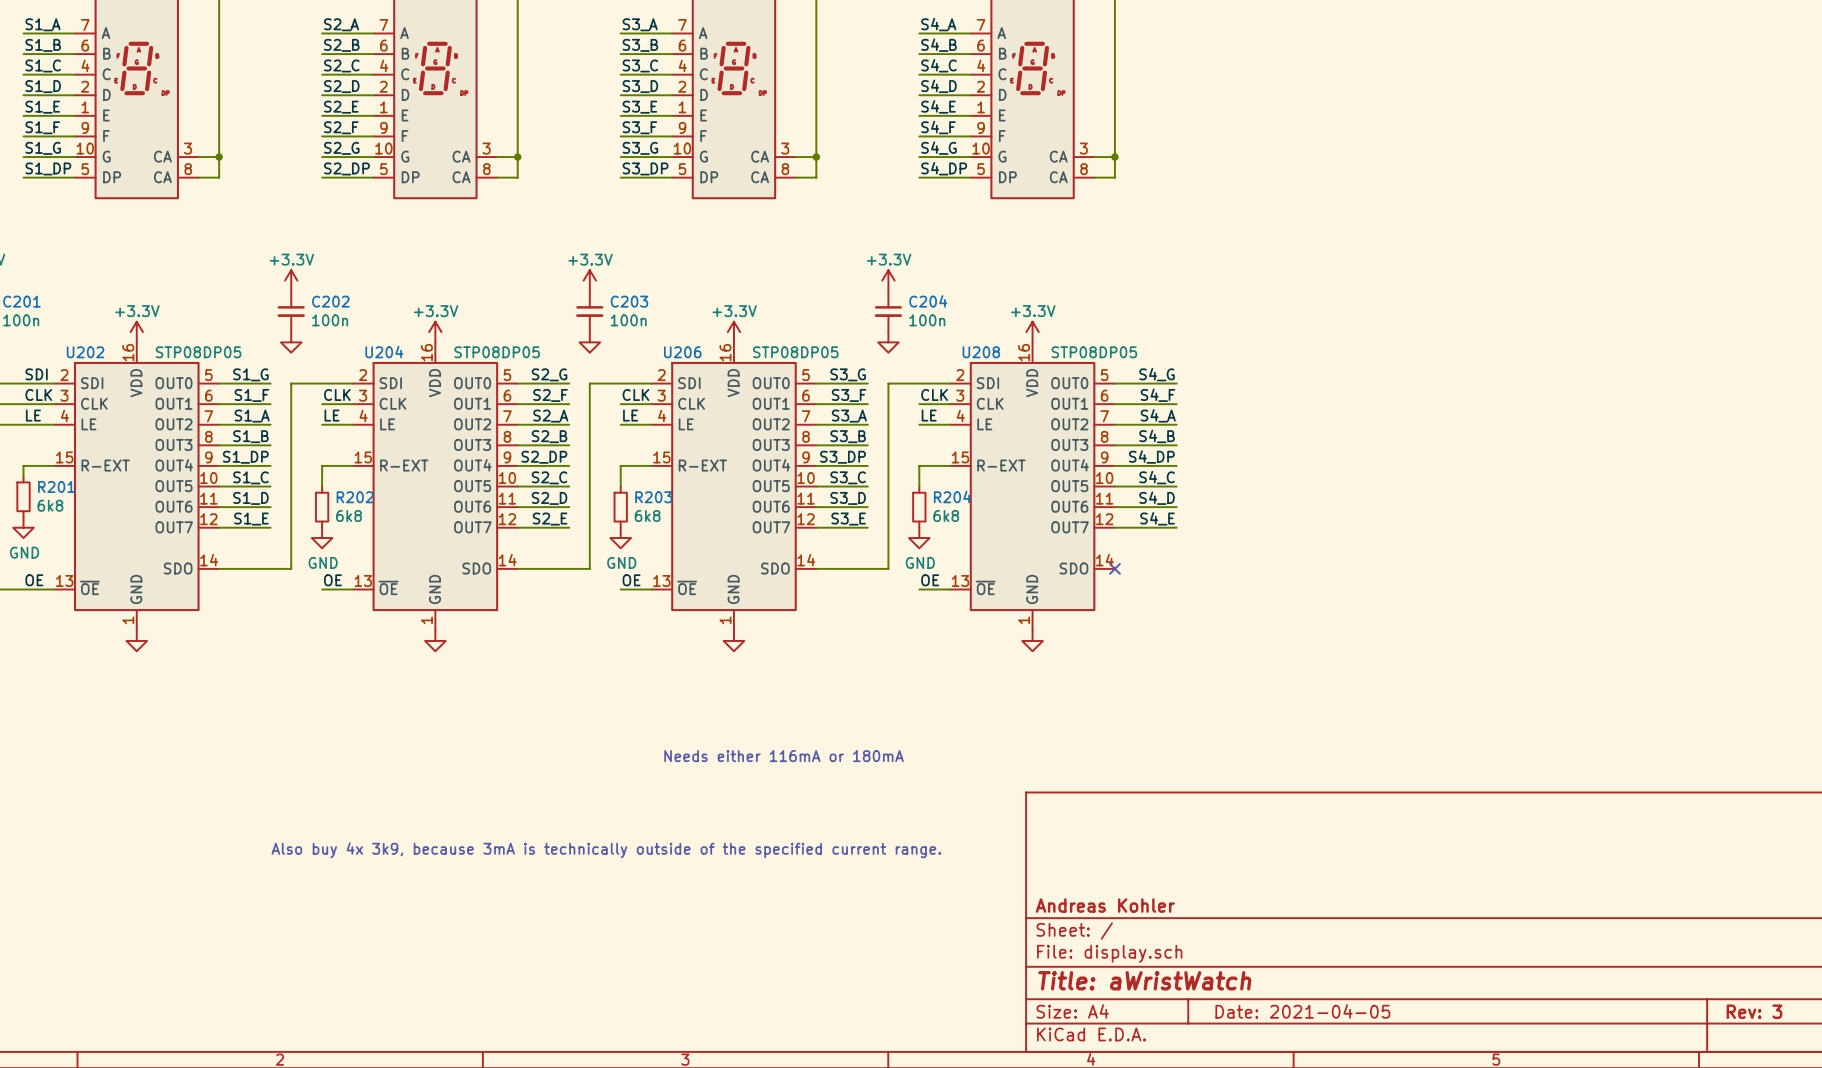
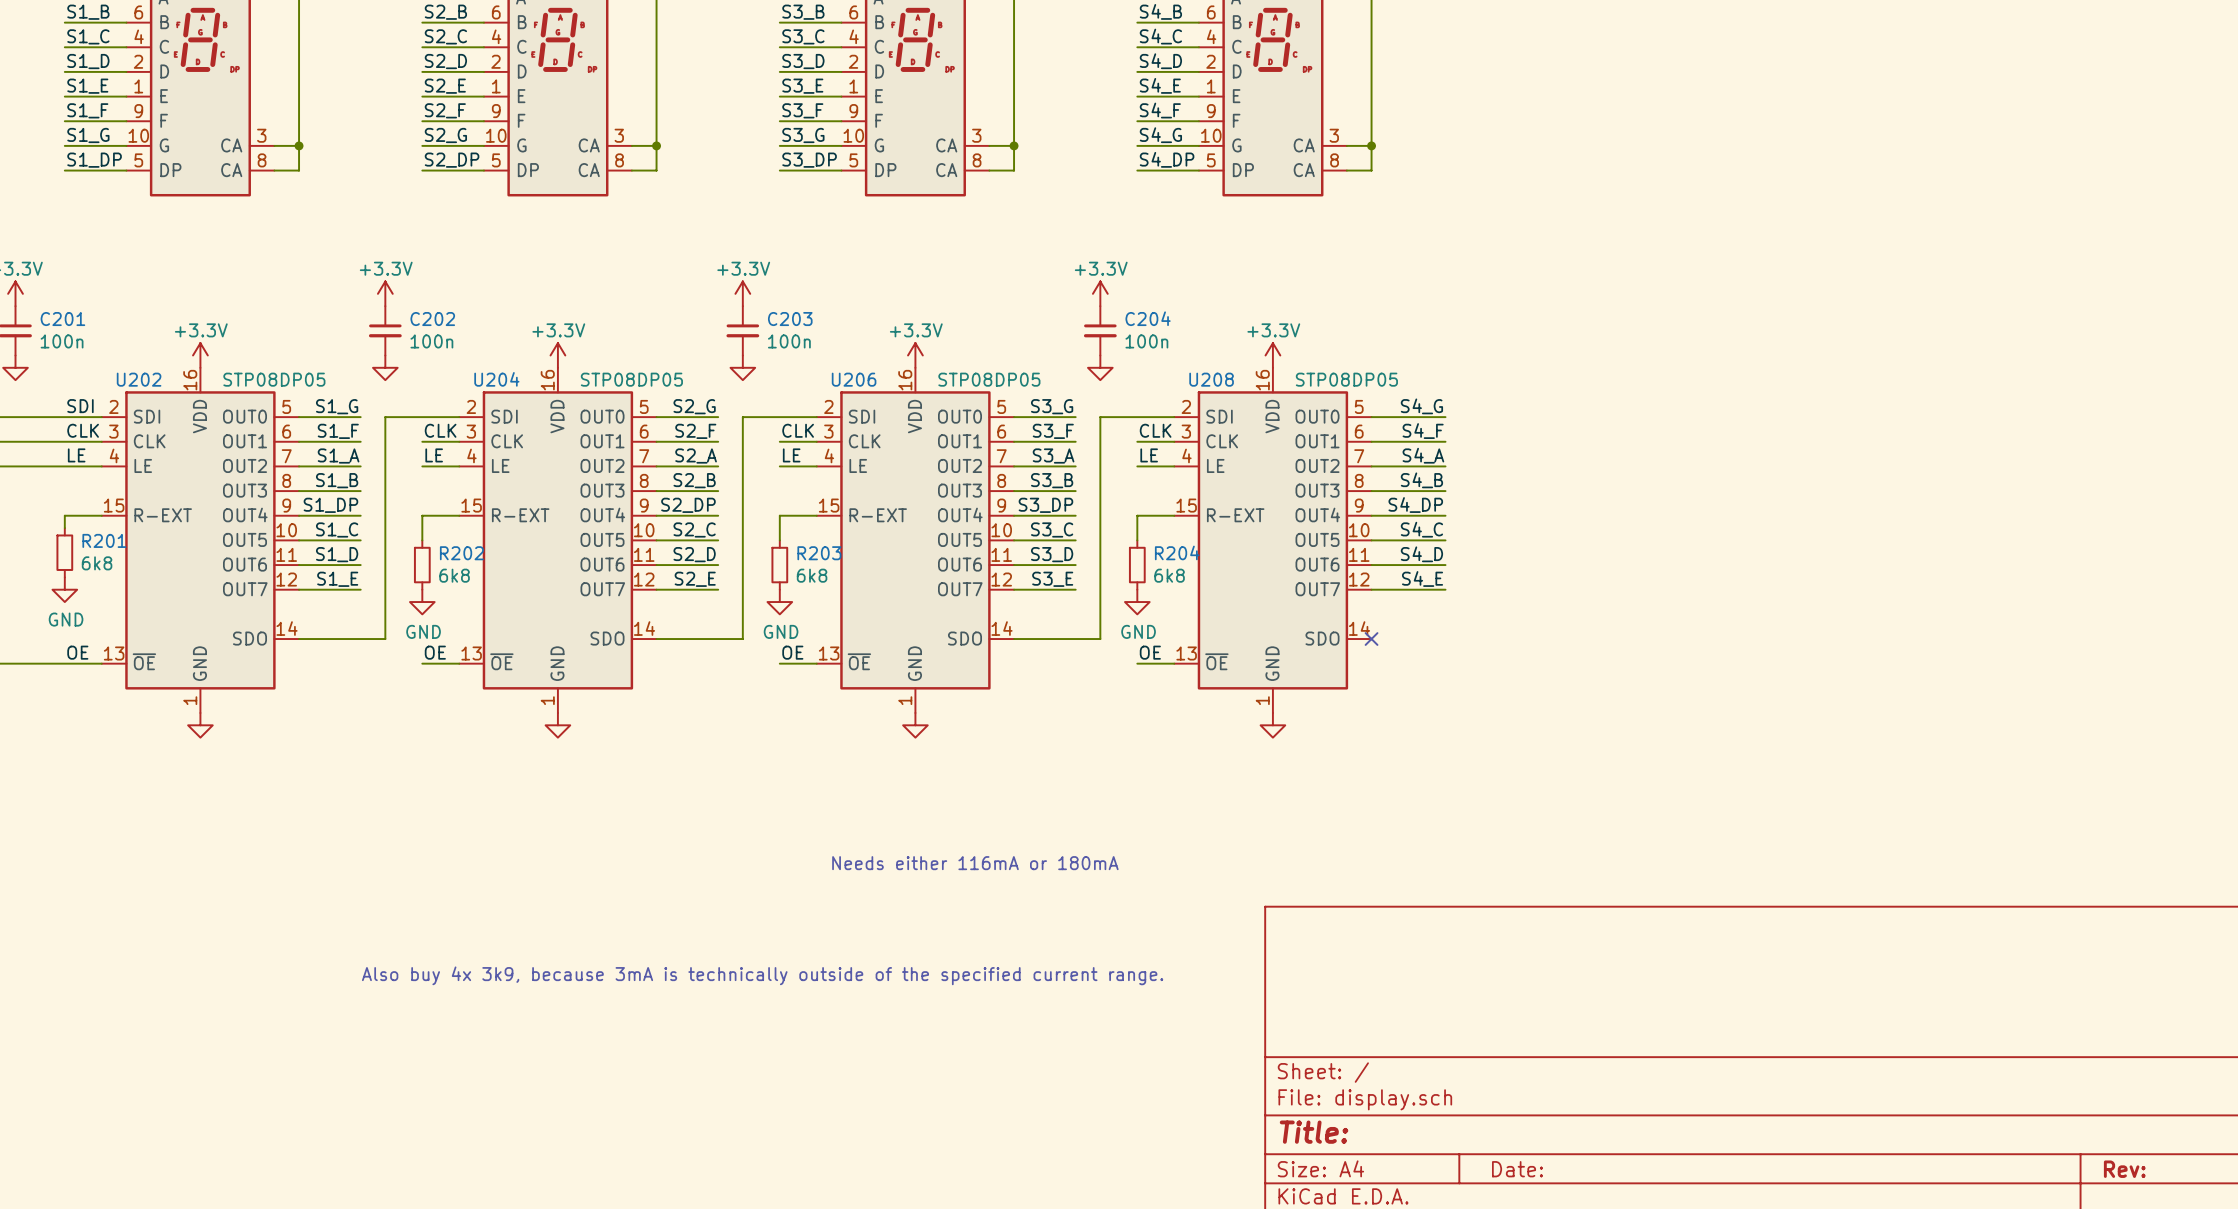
title block: Andreas Kohler (1105, 905) -> none
title block: Title: aWristWatch (1144, 980) -> Title: (1314, 1132)
title block: Date: 2021-04-05 (1302, 1011) -> Date: (1517, 1169)
title block: Rev: 3 (1754, 1011) -> Rev: (2124, 1169)

